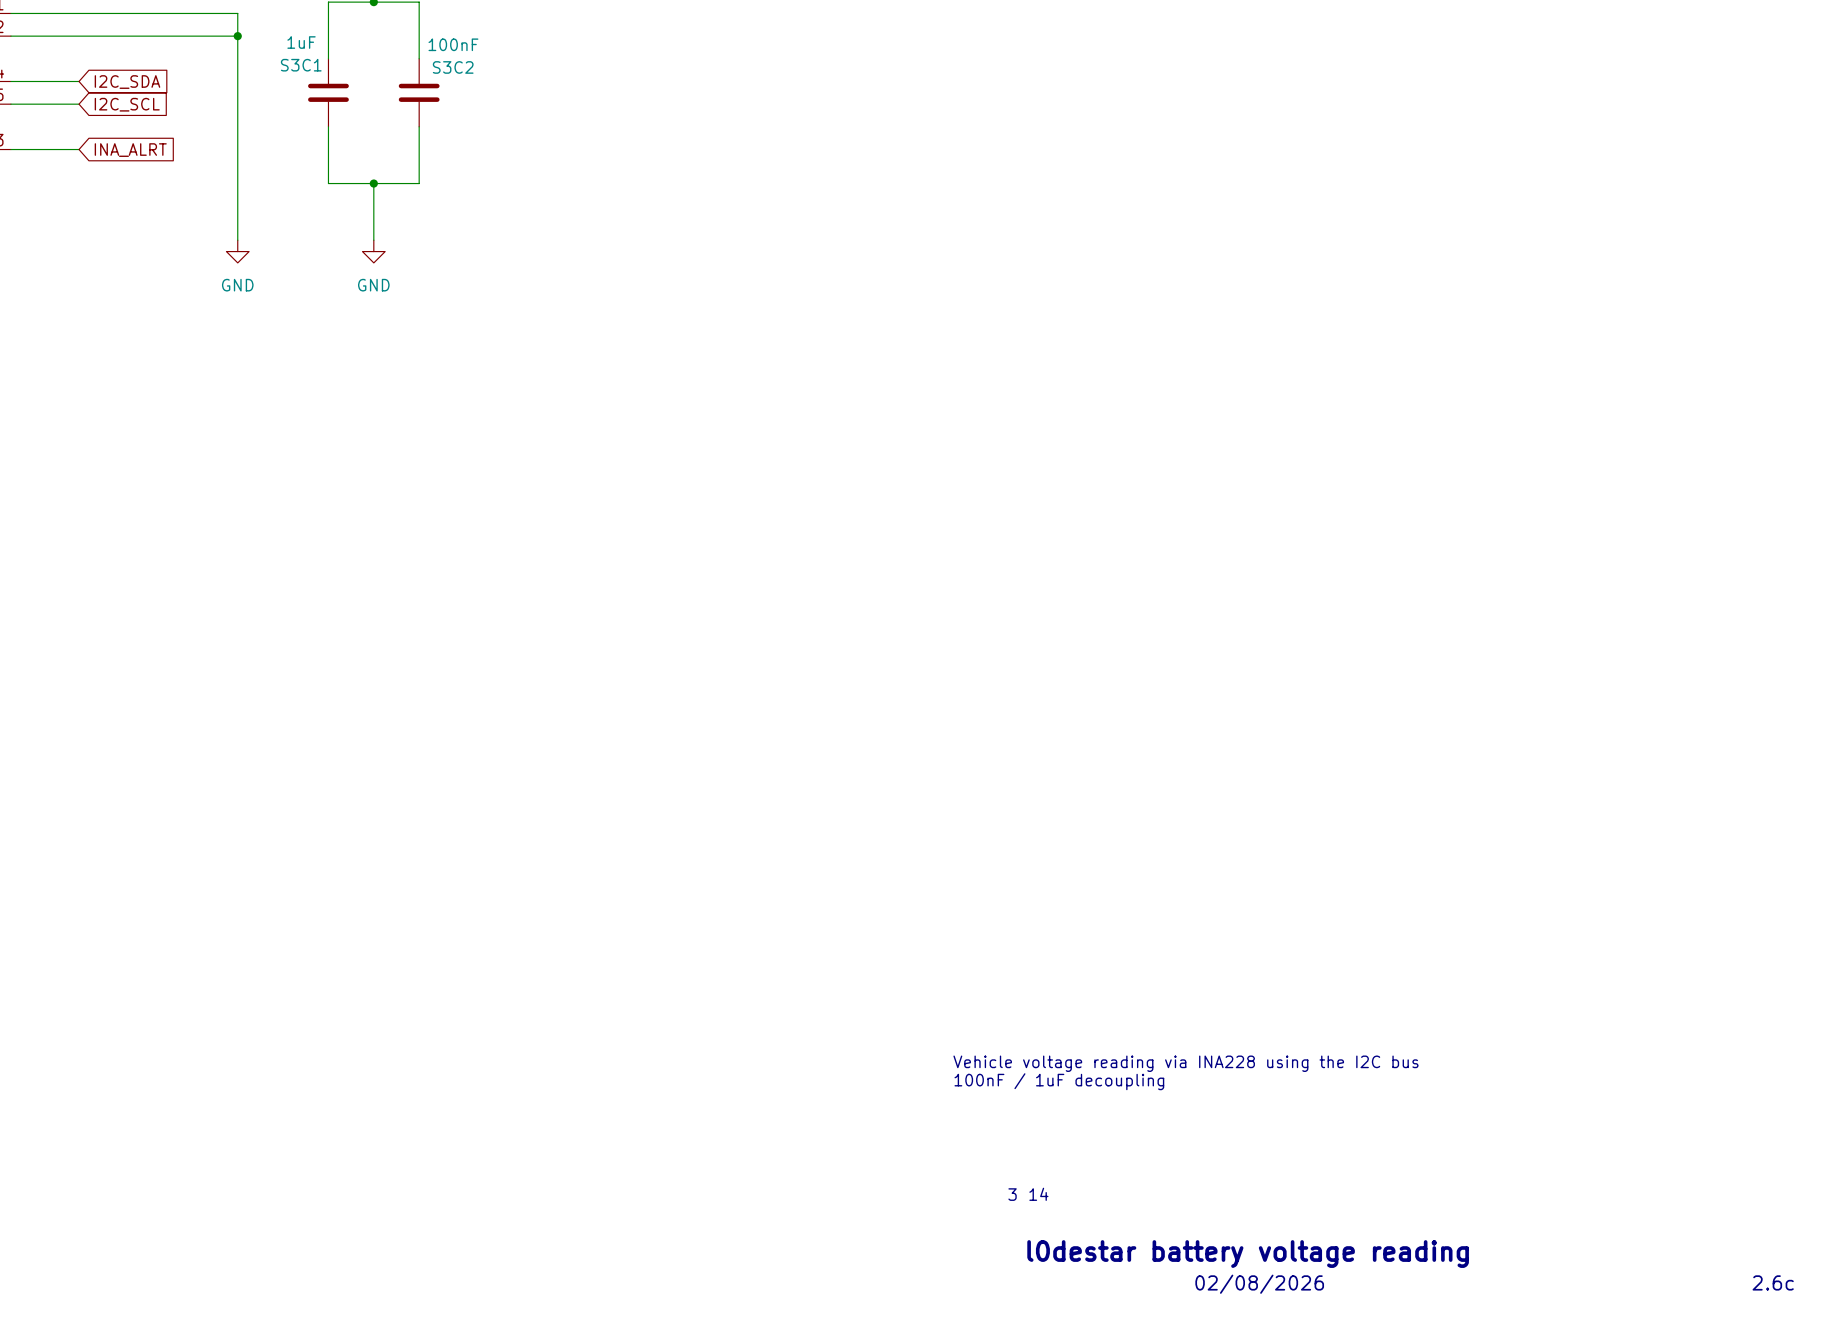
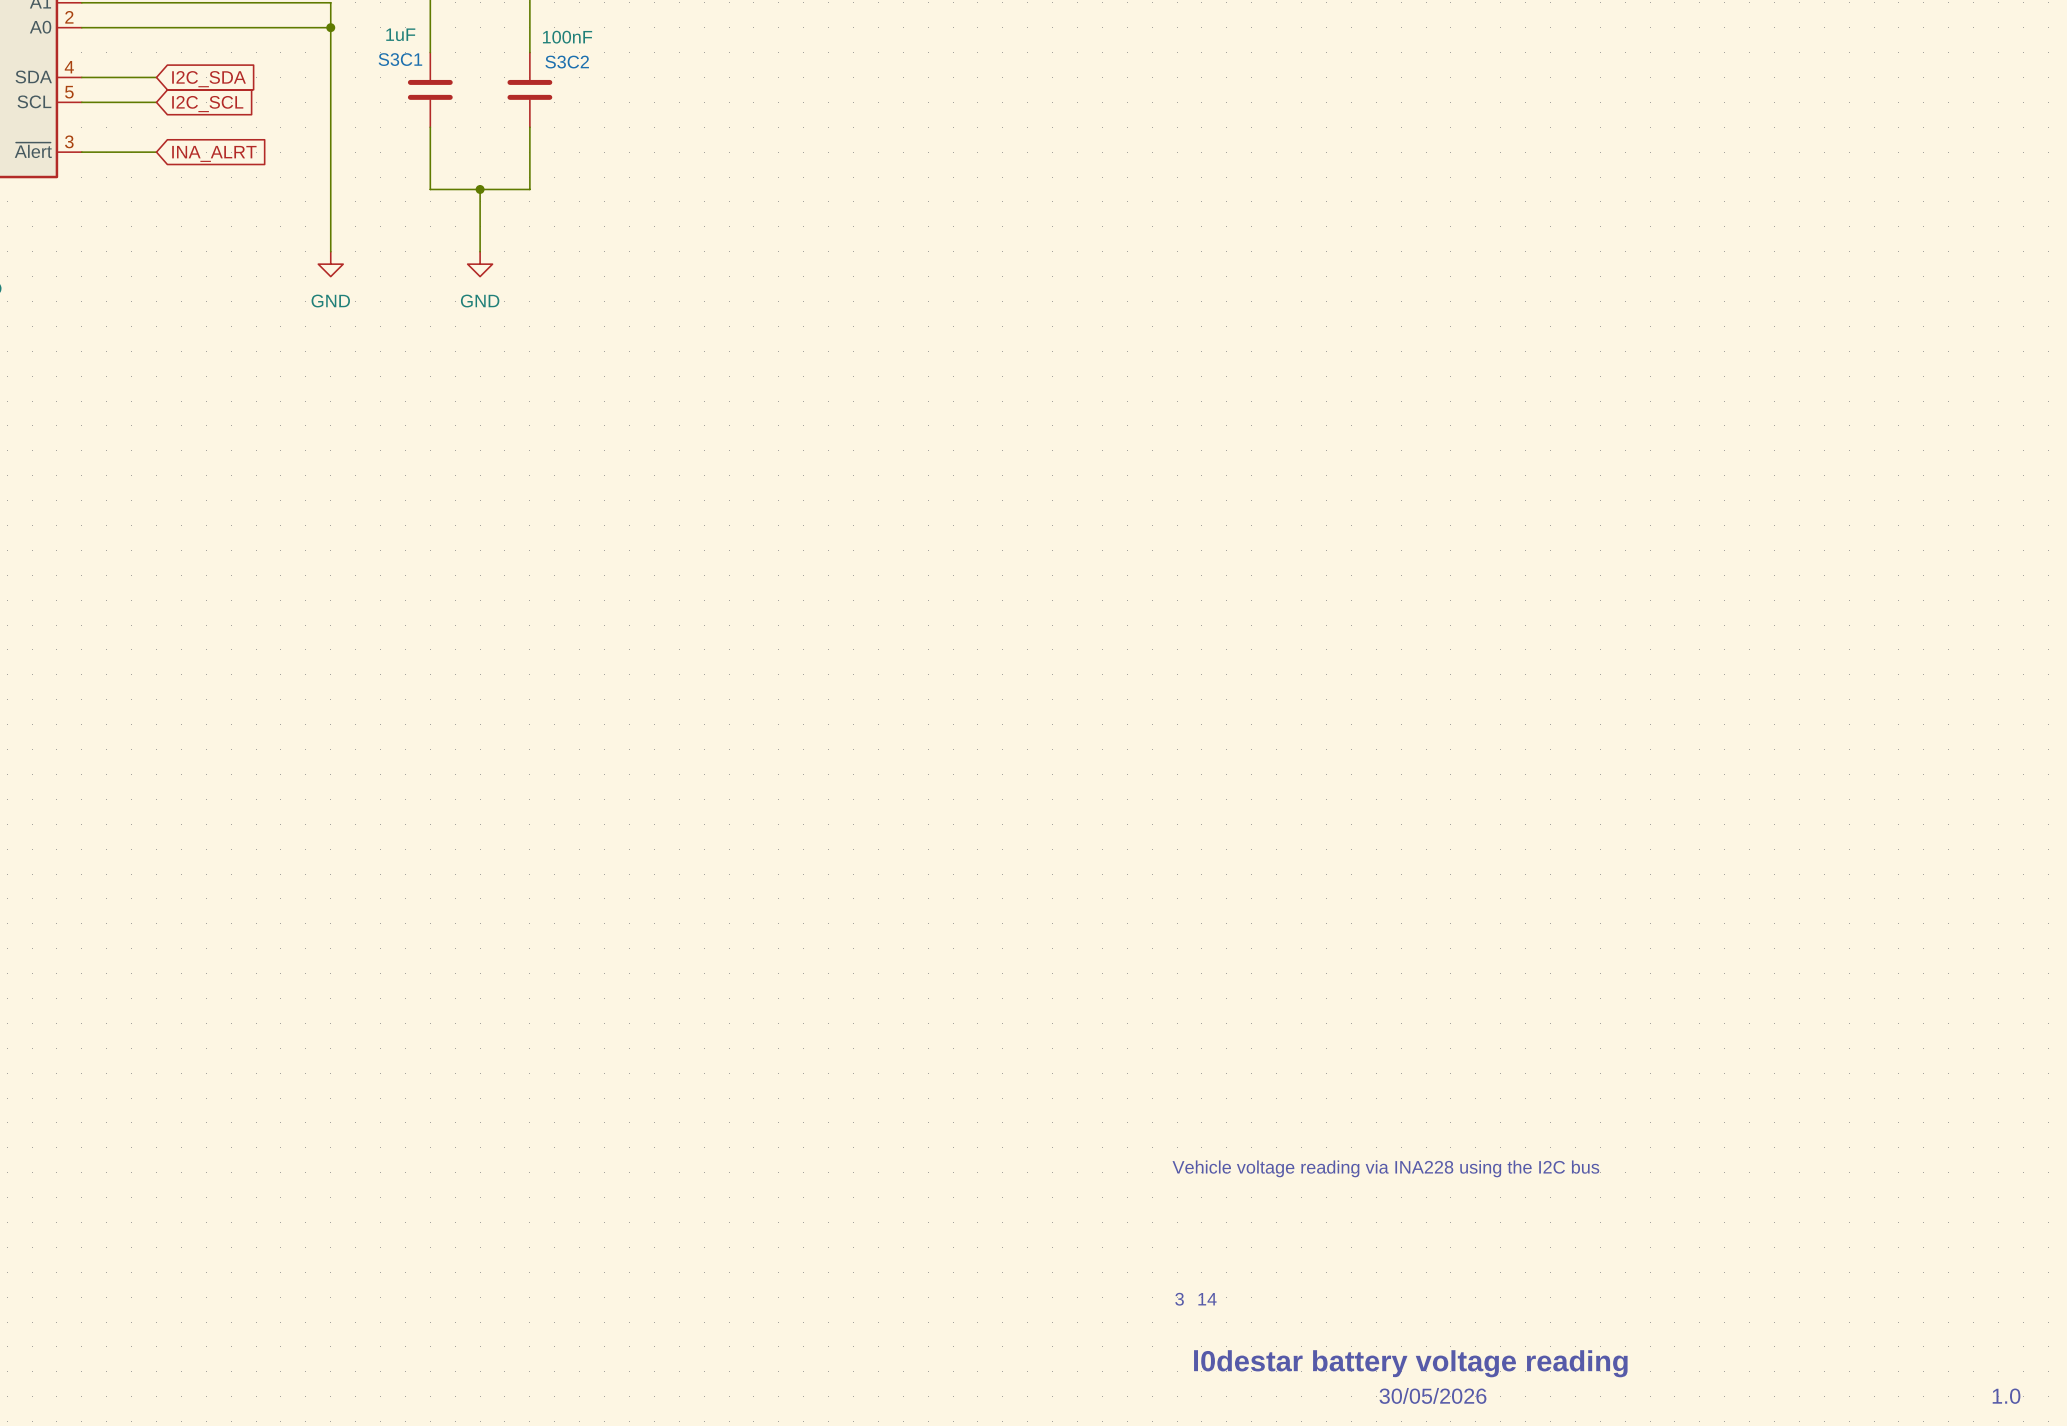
text: Vehicle voltage reading via INA228 using the I2C bus (1185, 1063) -> none
text: none -> Vehicle voltage reading via INA228 using the I2C bus (1385, 1168)
text: 100nF / 1uF decoupling (1059, 1081) -> none
text: 2.6c (1773, 1282) -> 1.0 (2006, 1396)
text: 02/08/2026 (1259, 1284) -> 30/05/2026 (1432, 1395)

